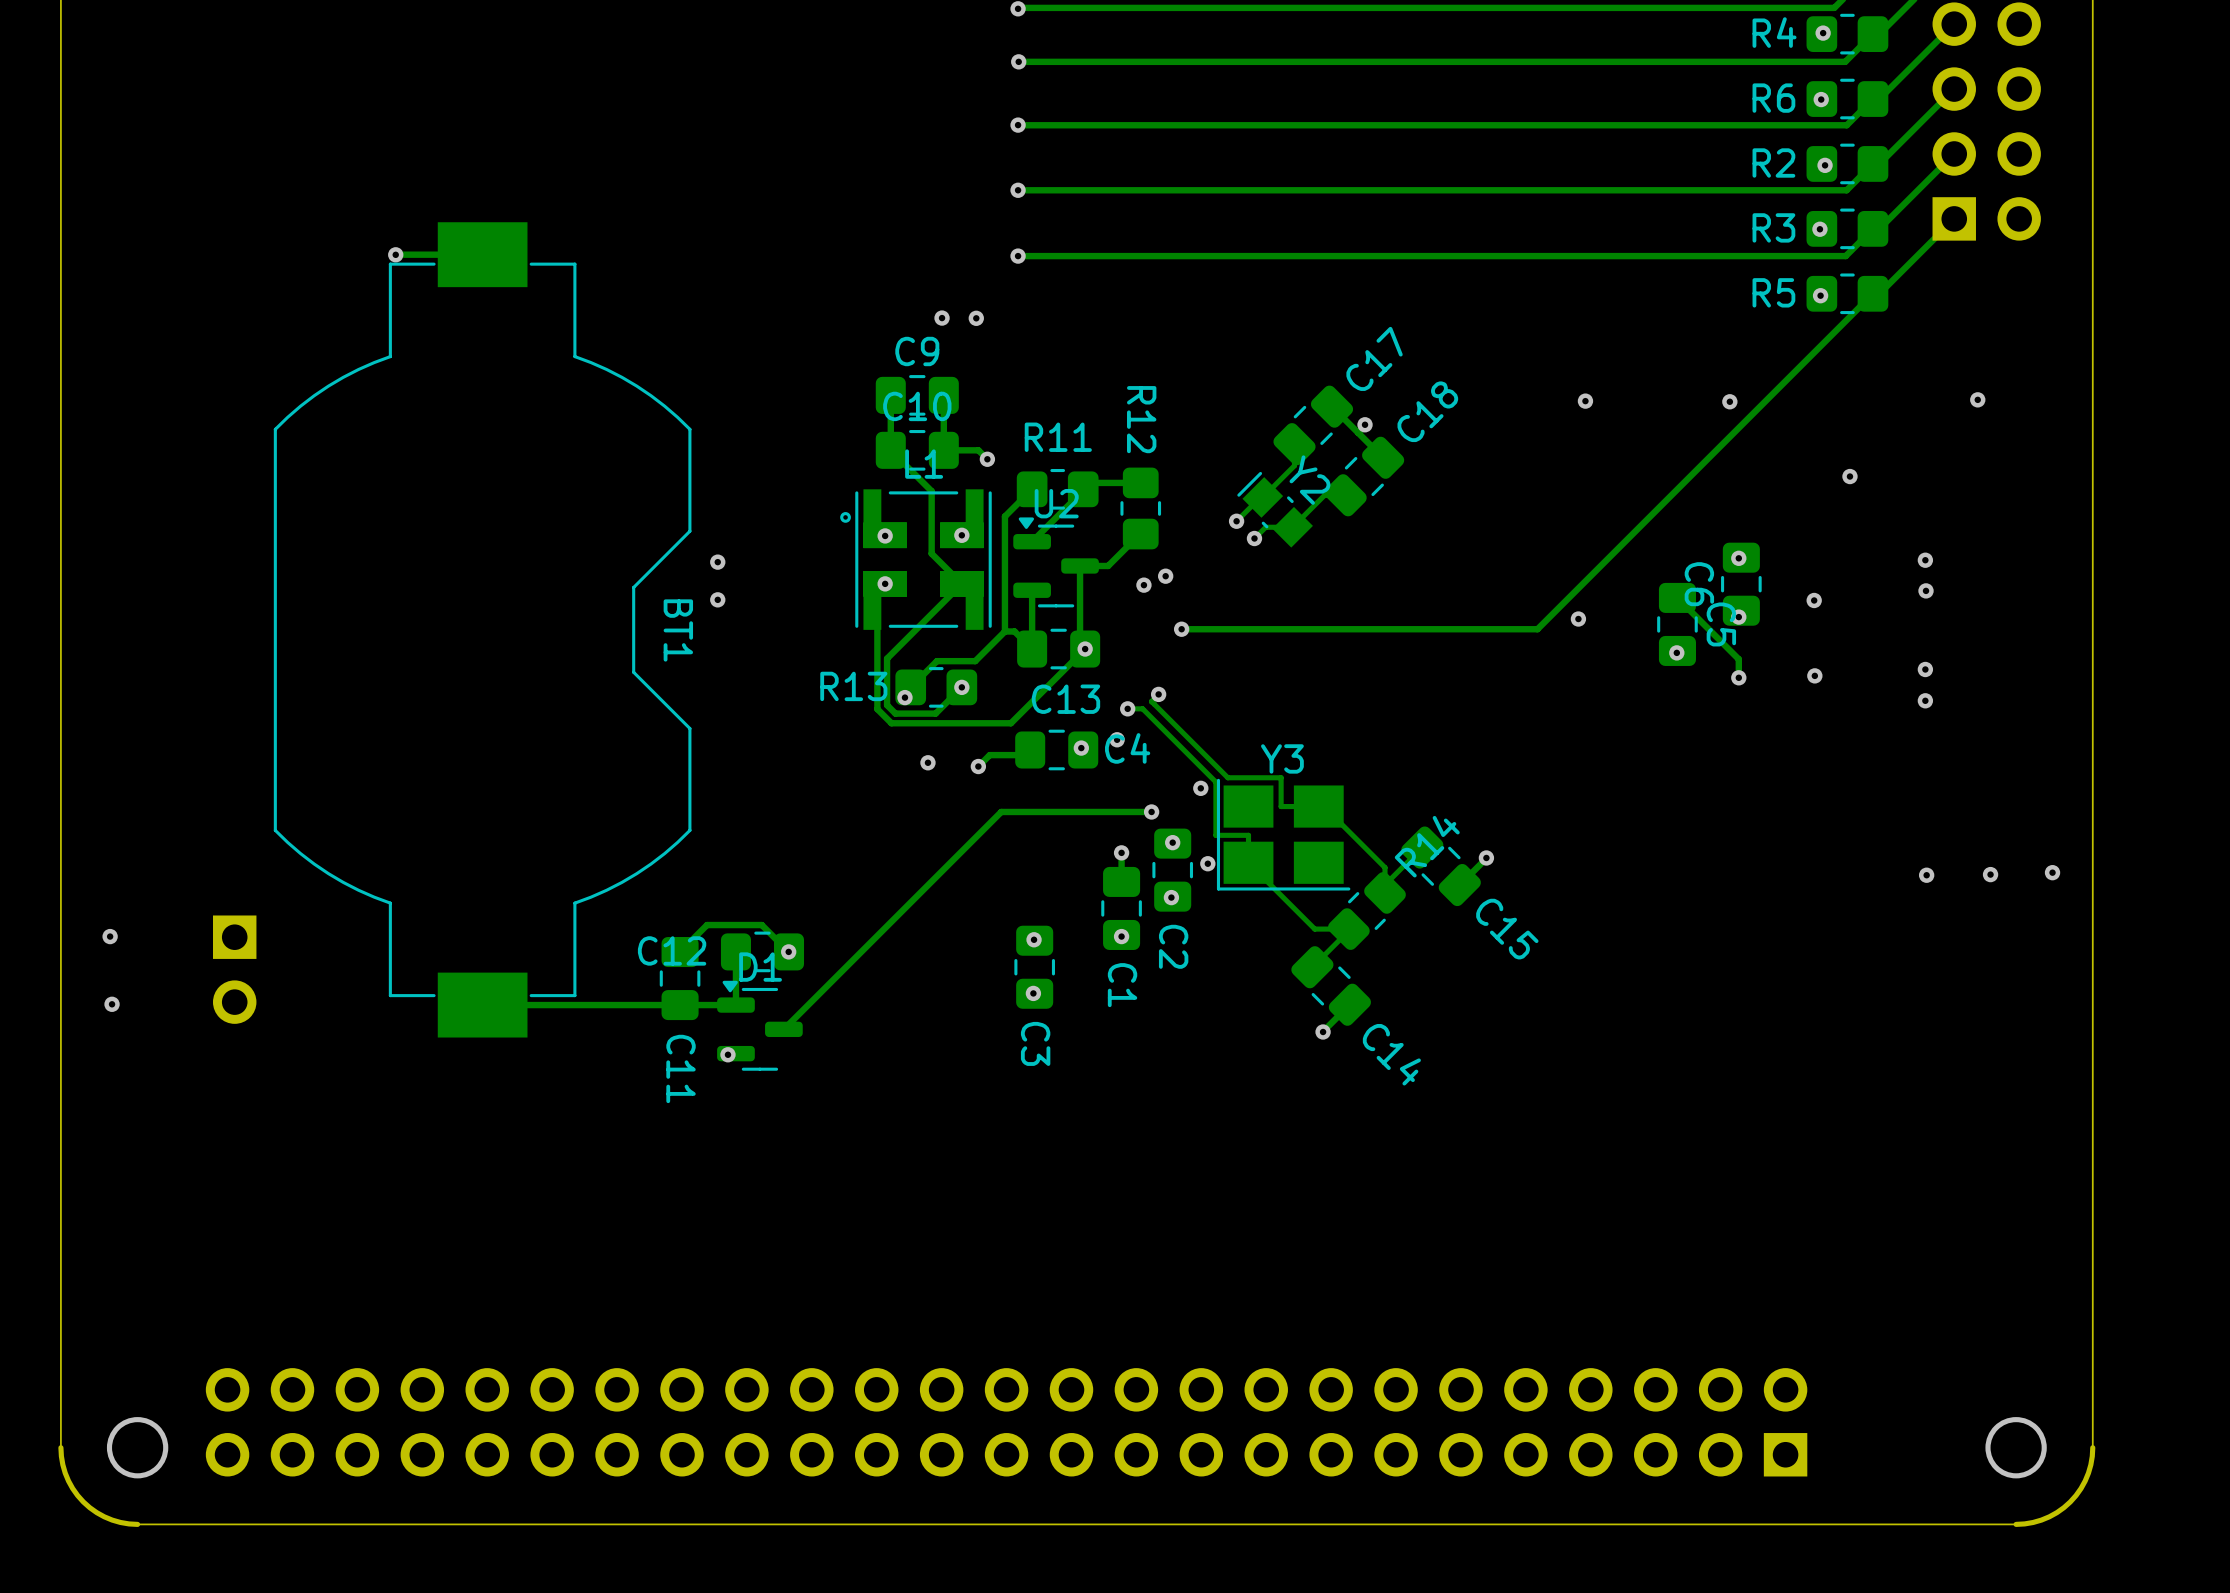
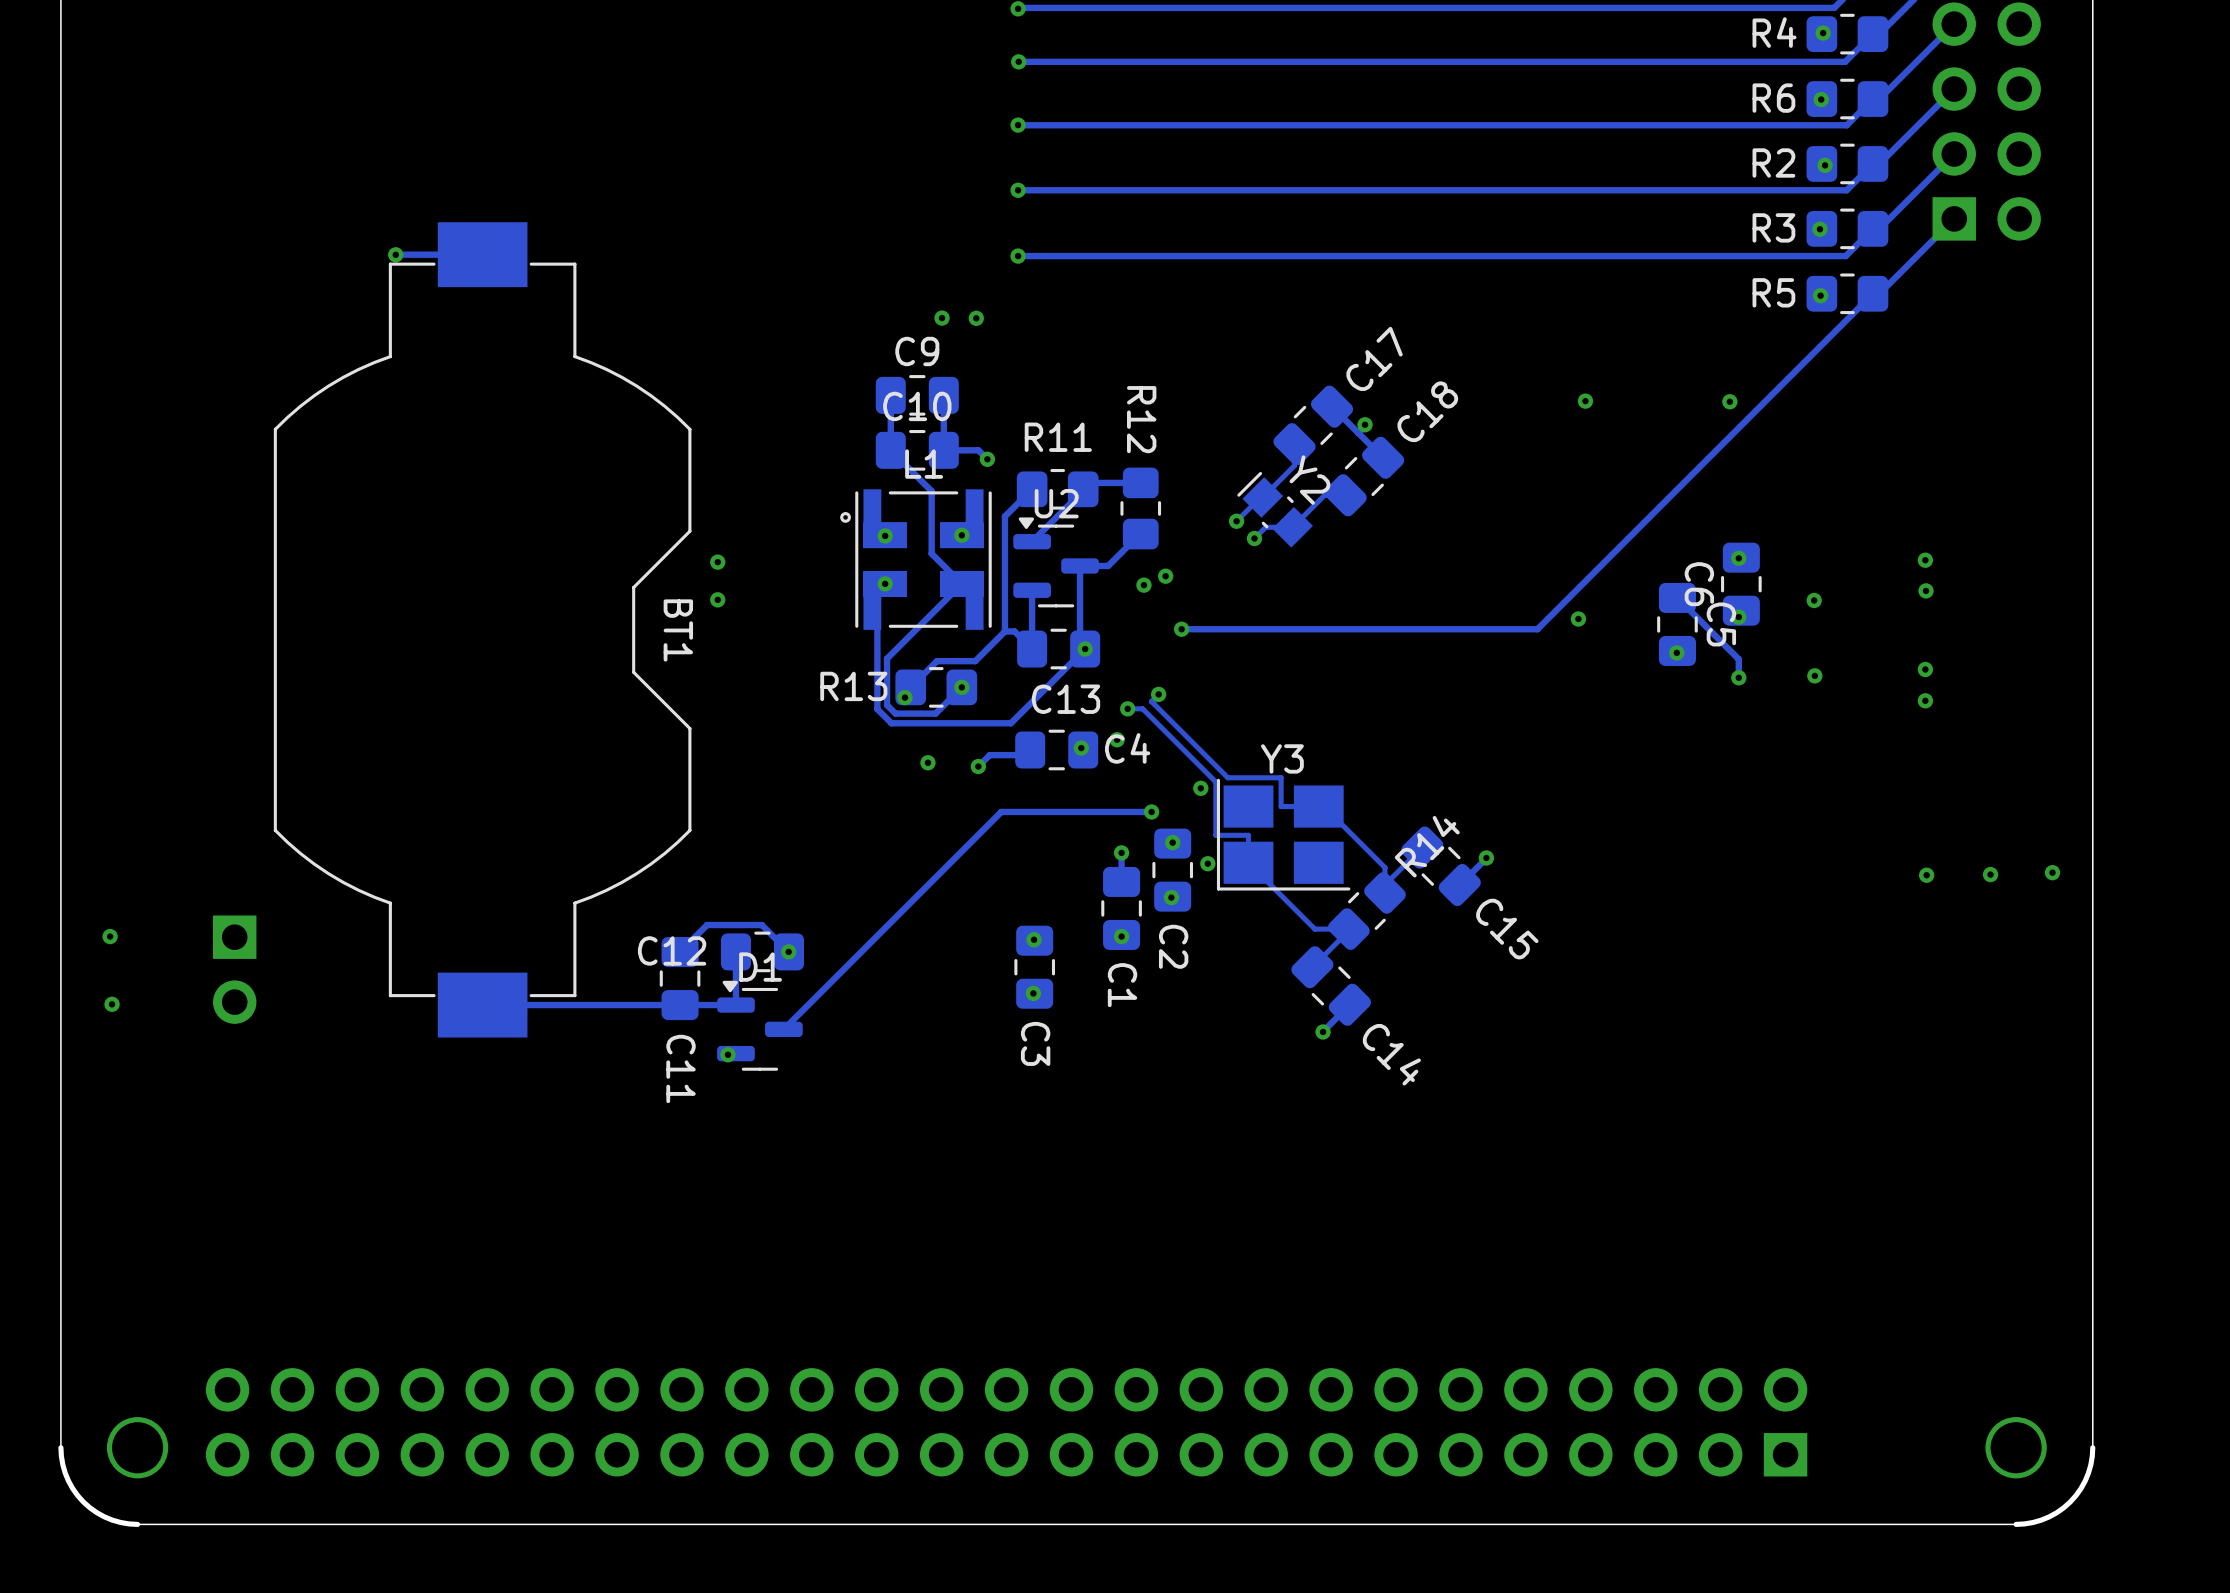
via: (1977, 399) -> none
via: (1849, 476) -> none

